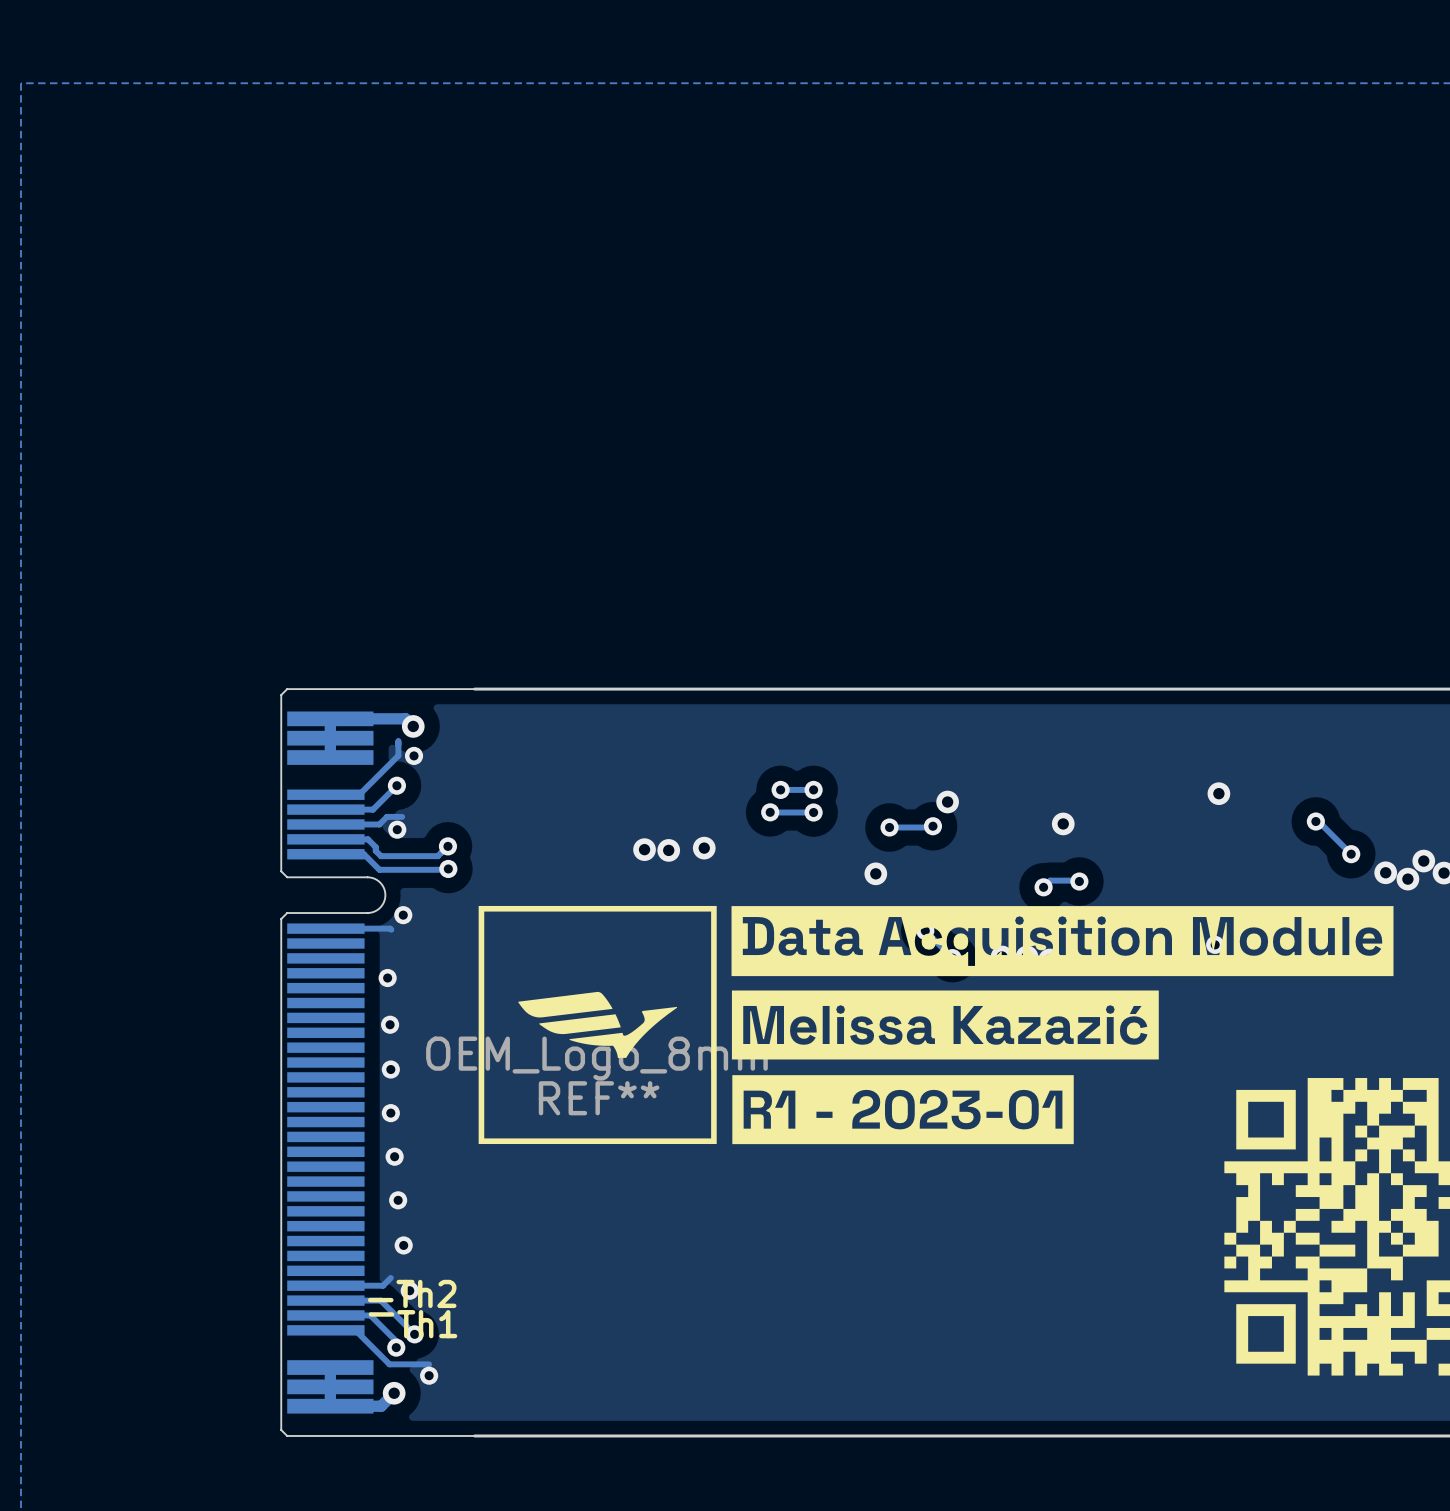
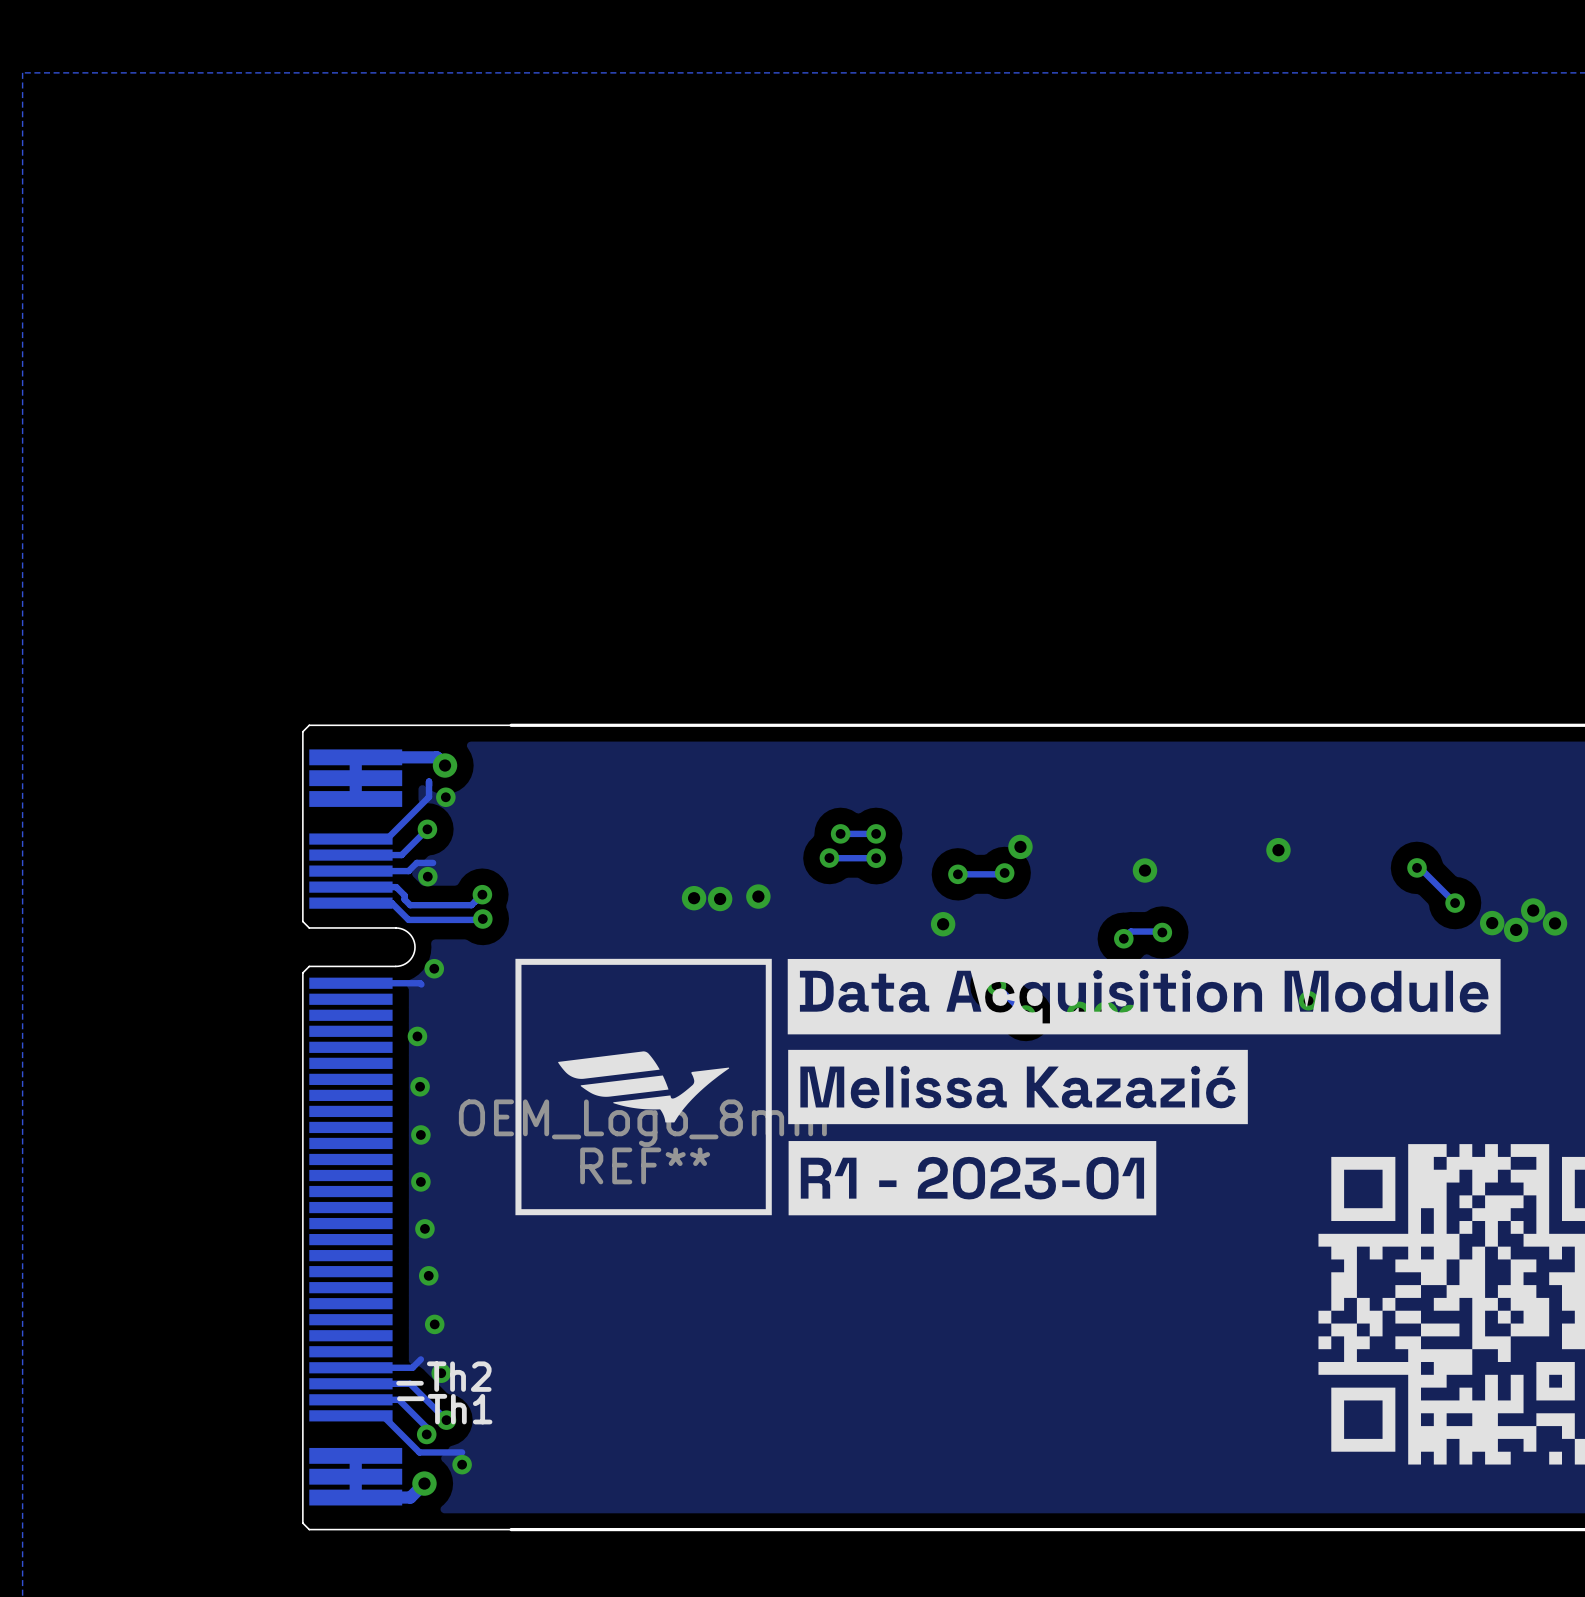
via position: (1218, 793) -> (1278, 850)

